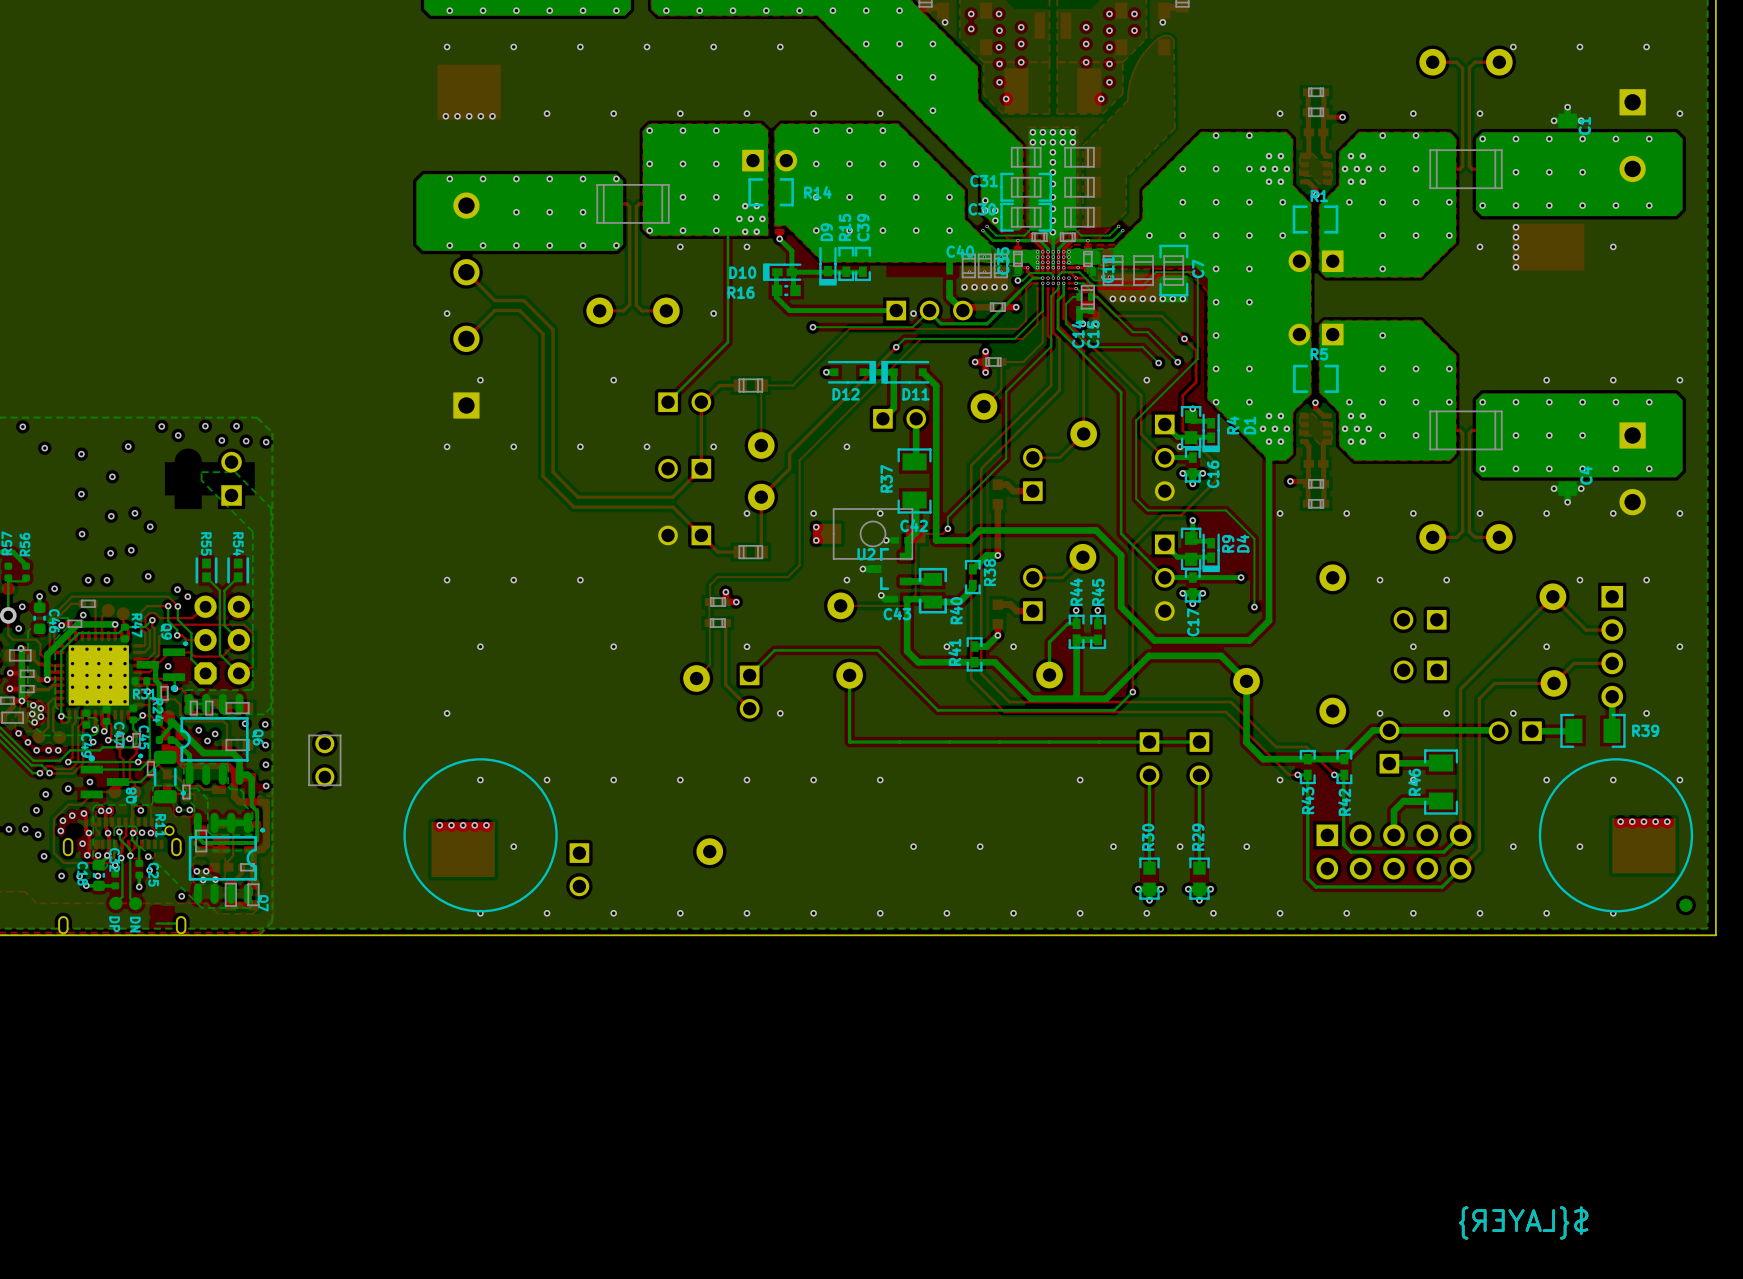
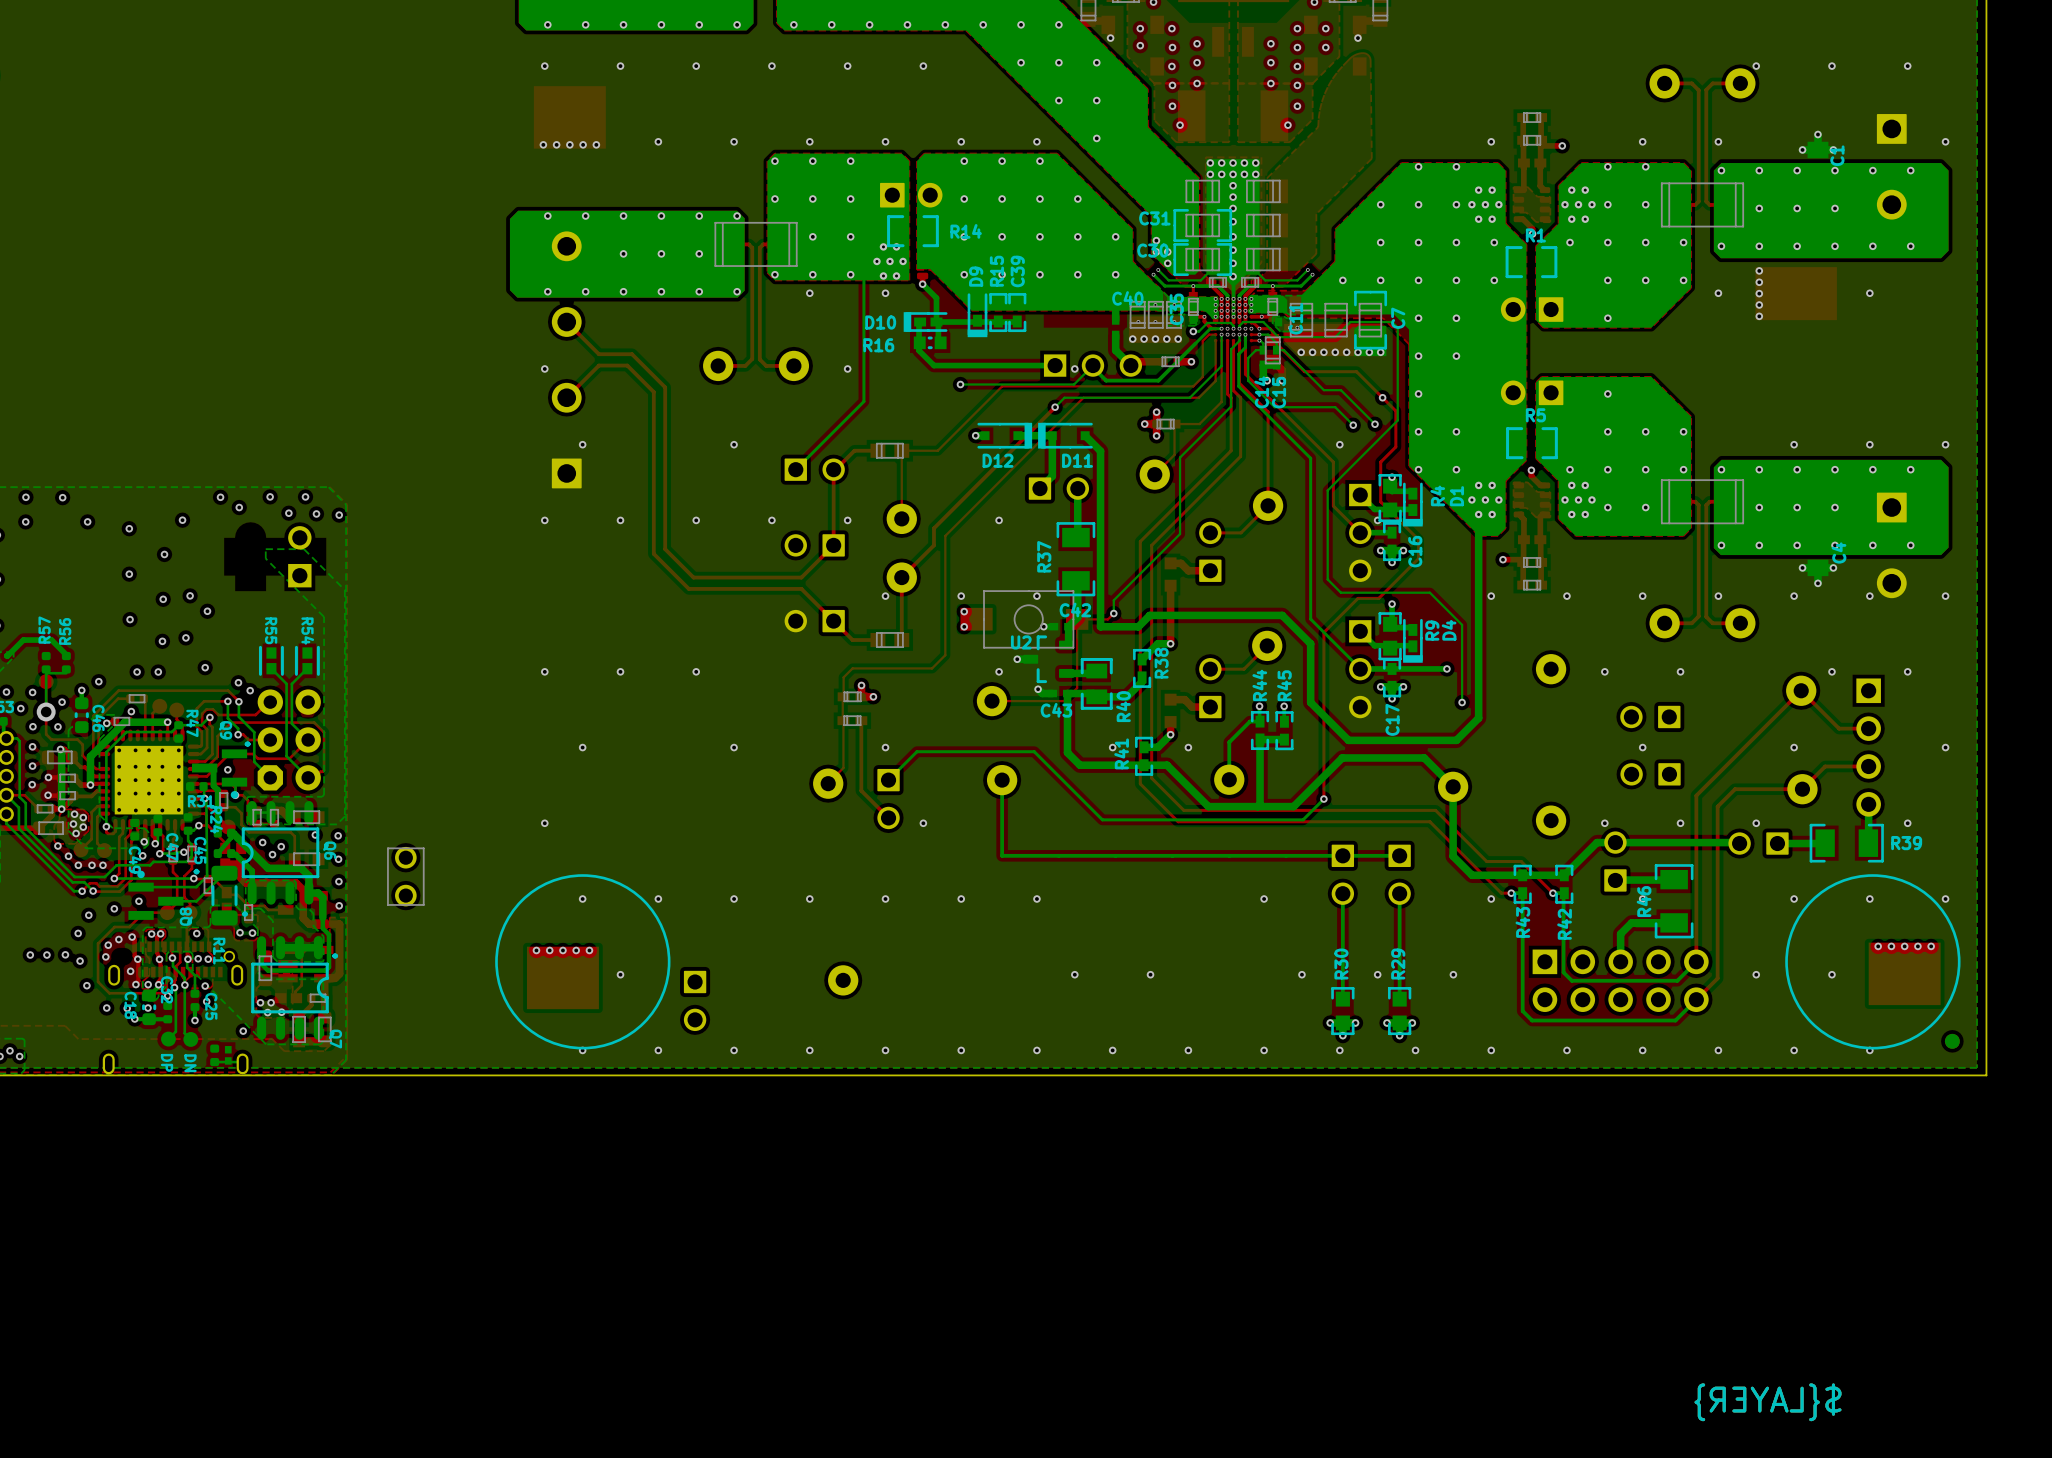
part: none -> (214, 1055)
part: none -> (228, 1055)

